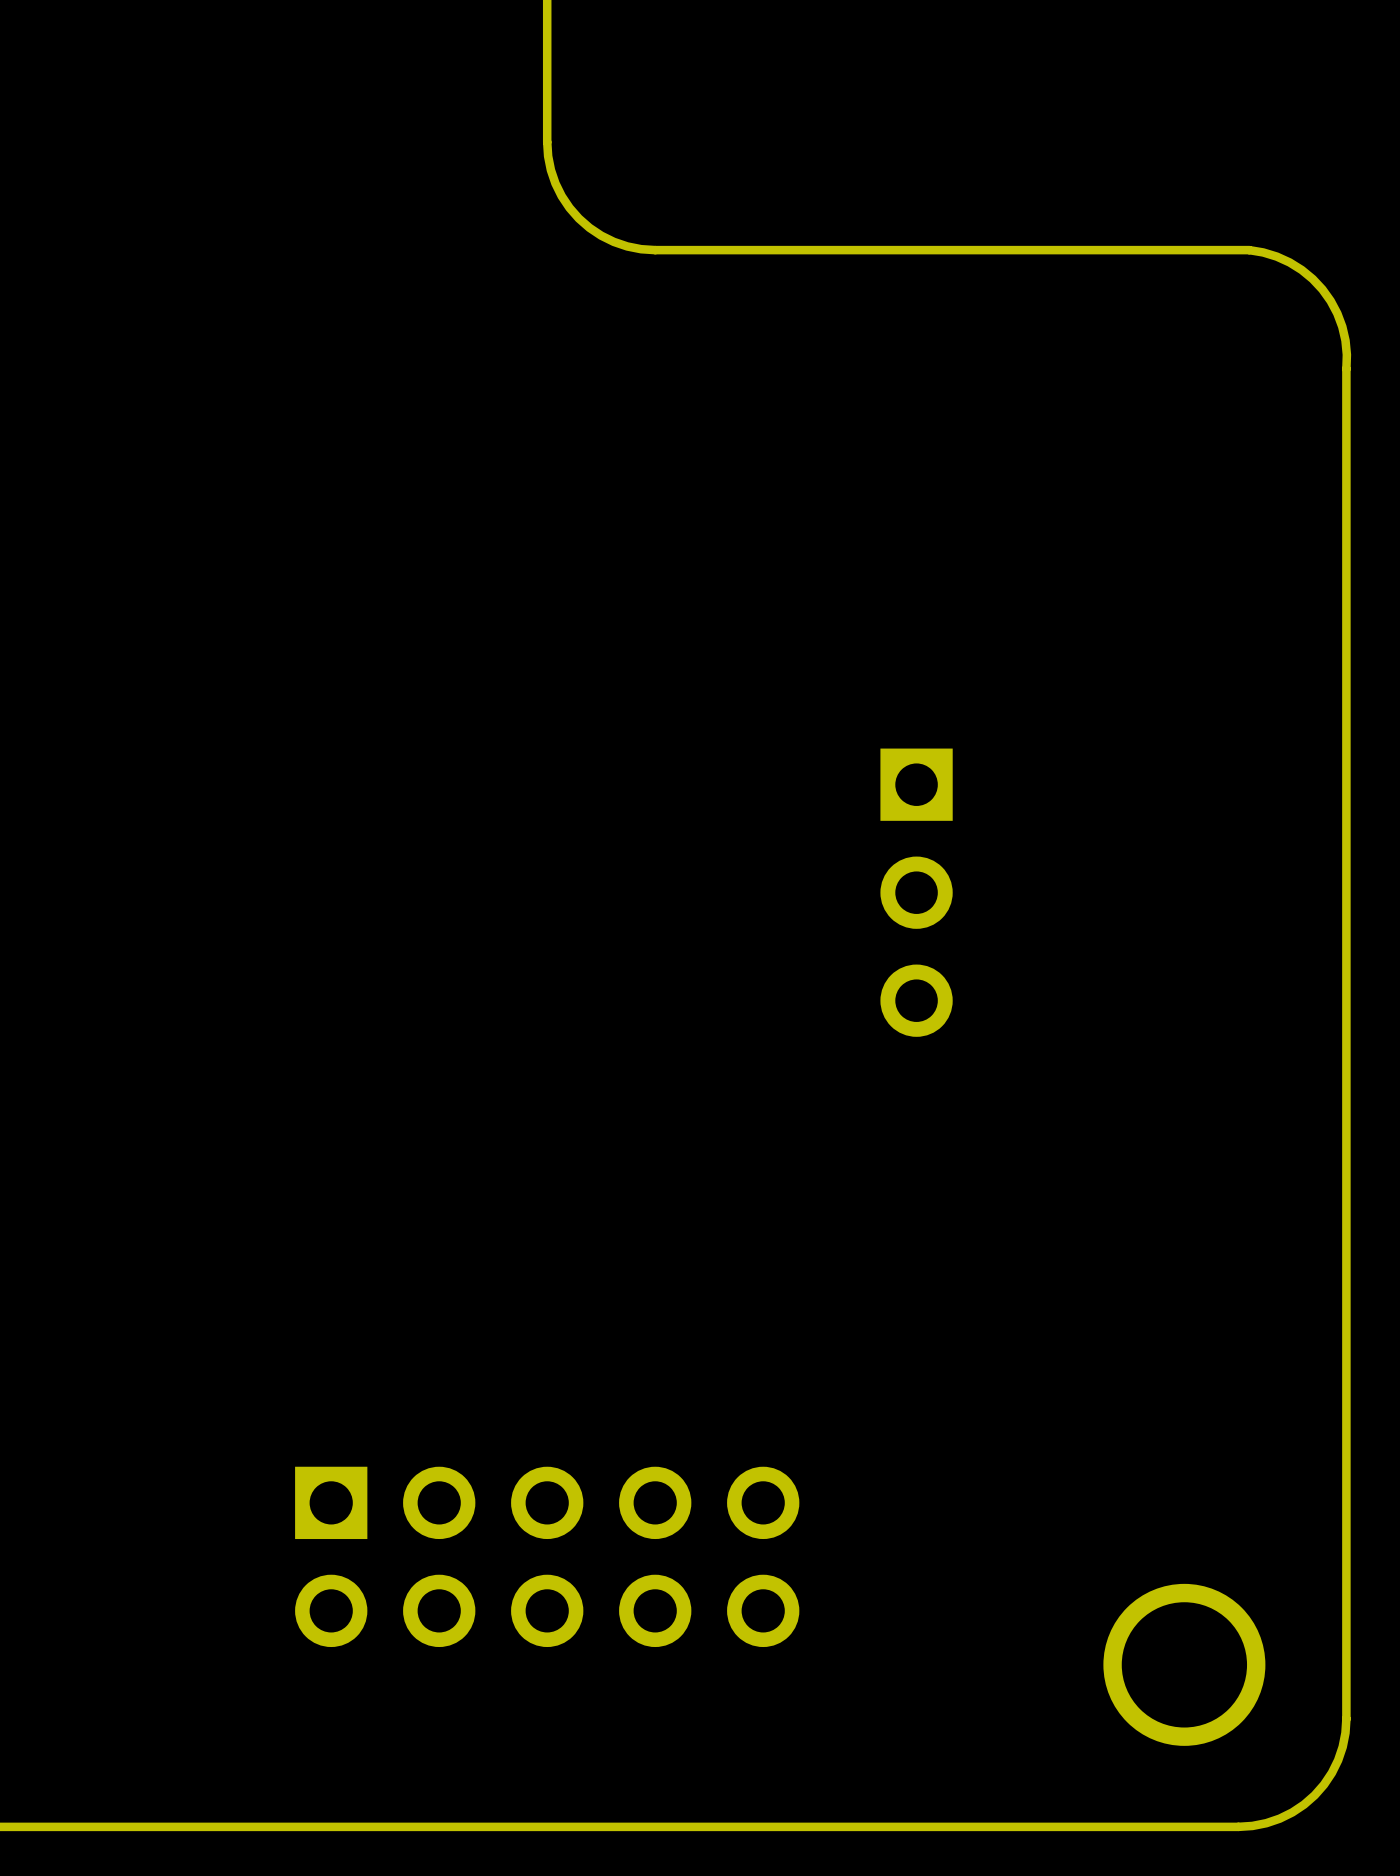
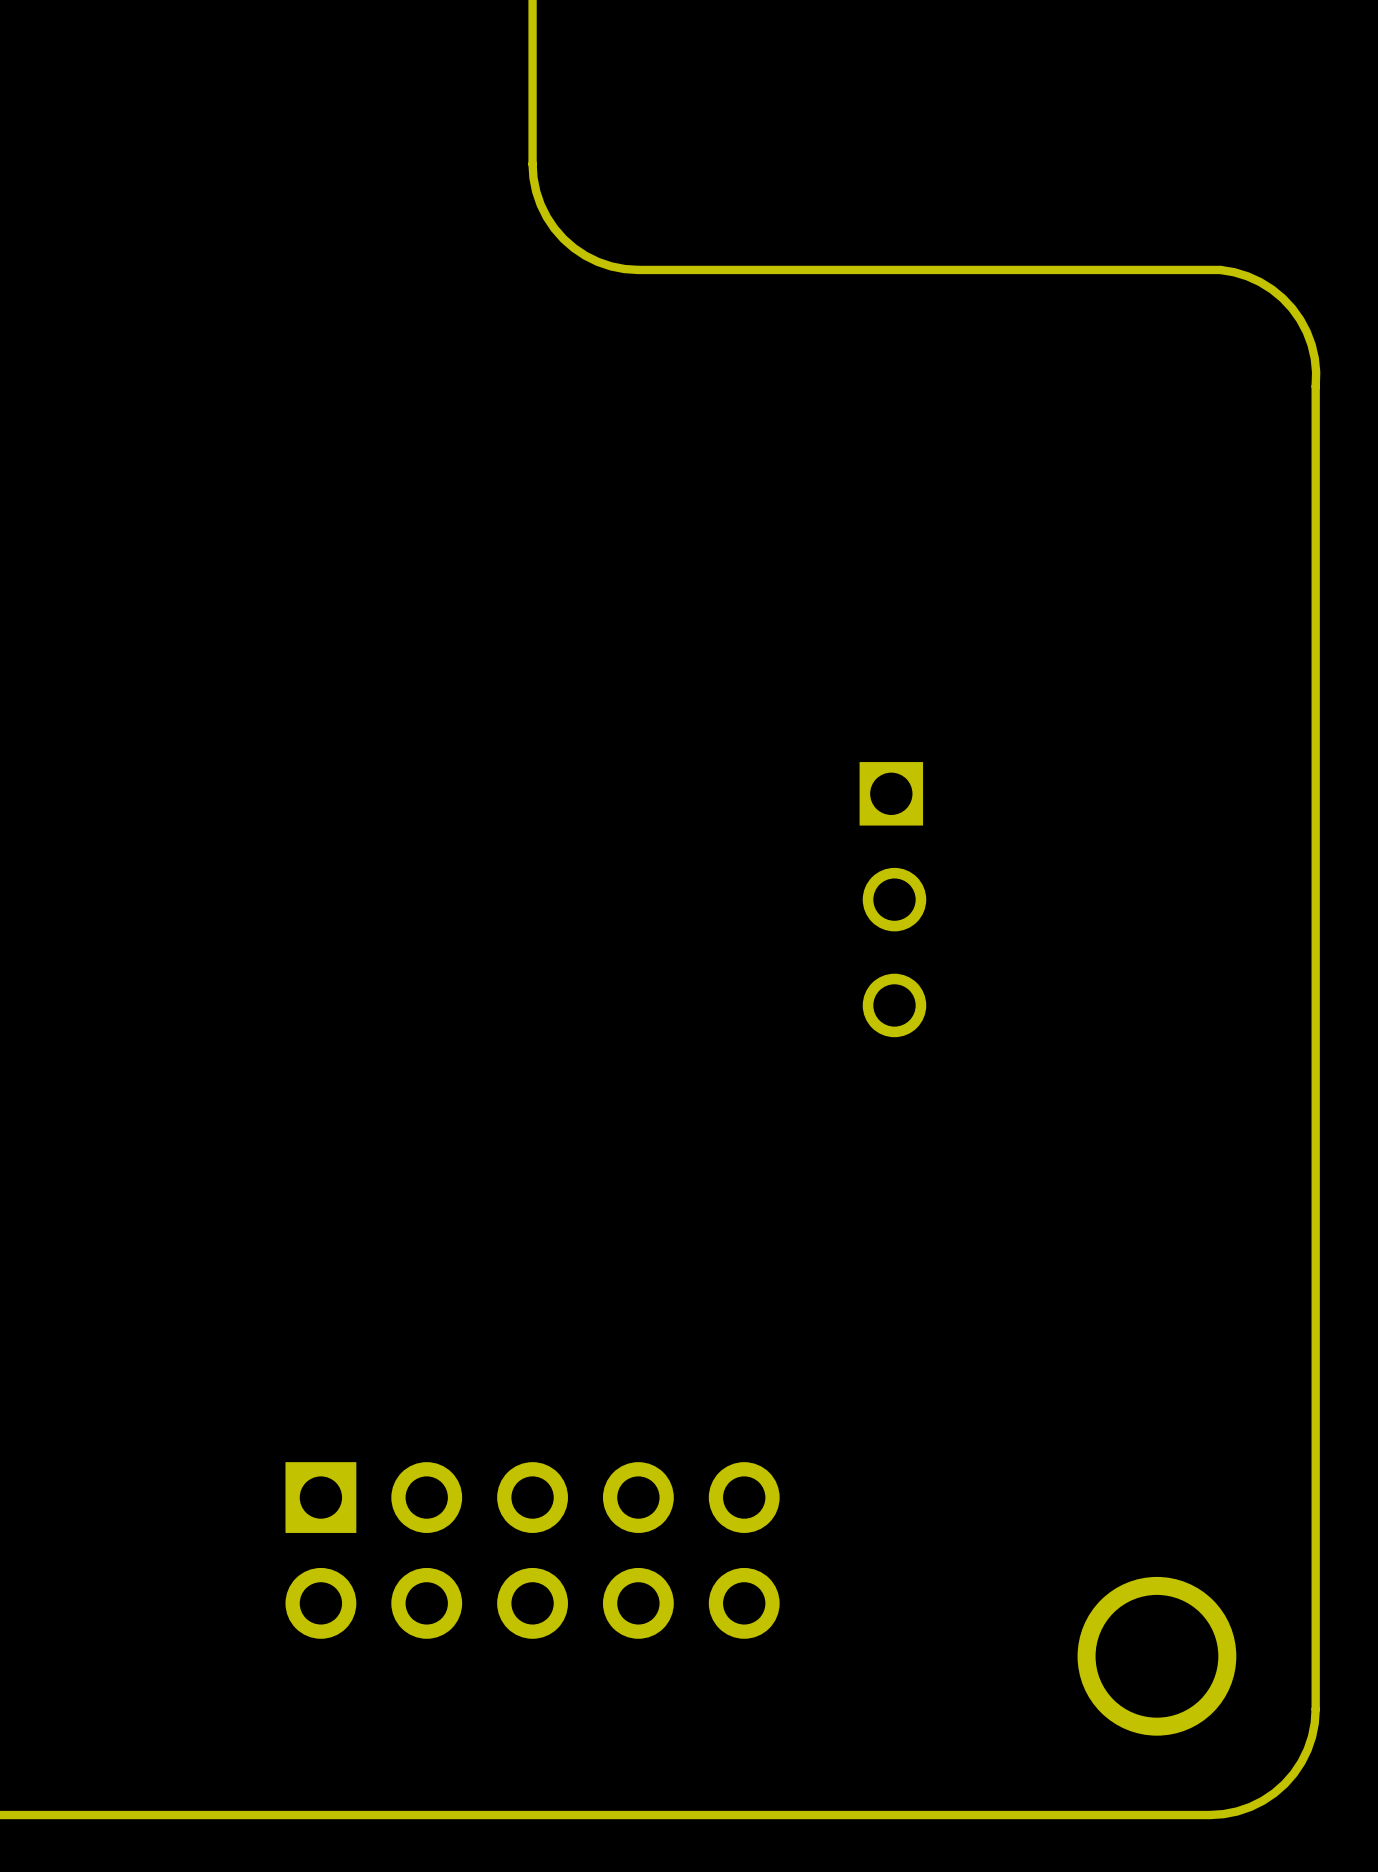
part footprint: [880, 748, 953, 1037] -> [859, 762, 927, 1038]

